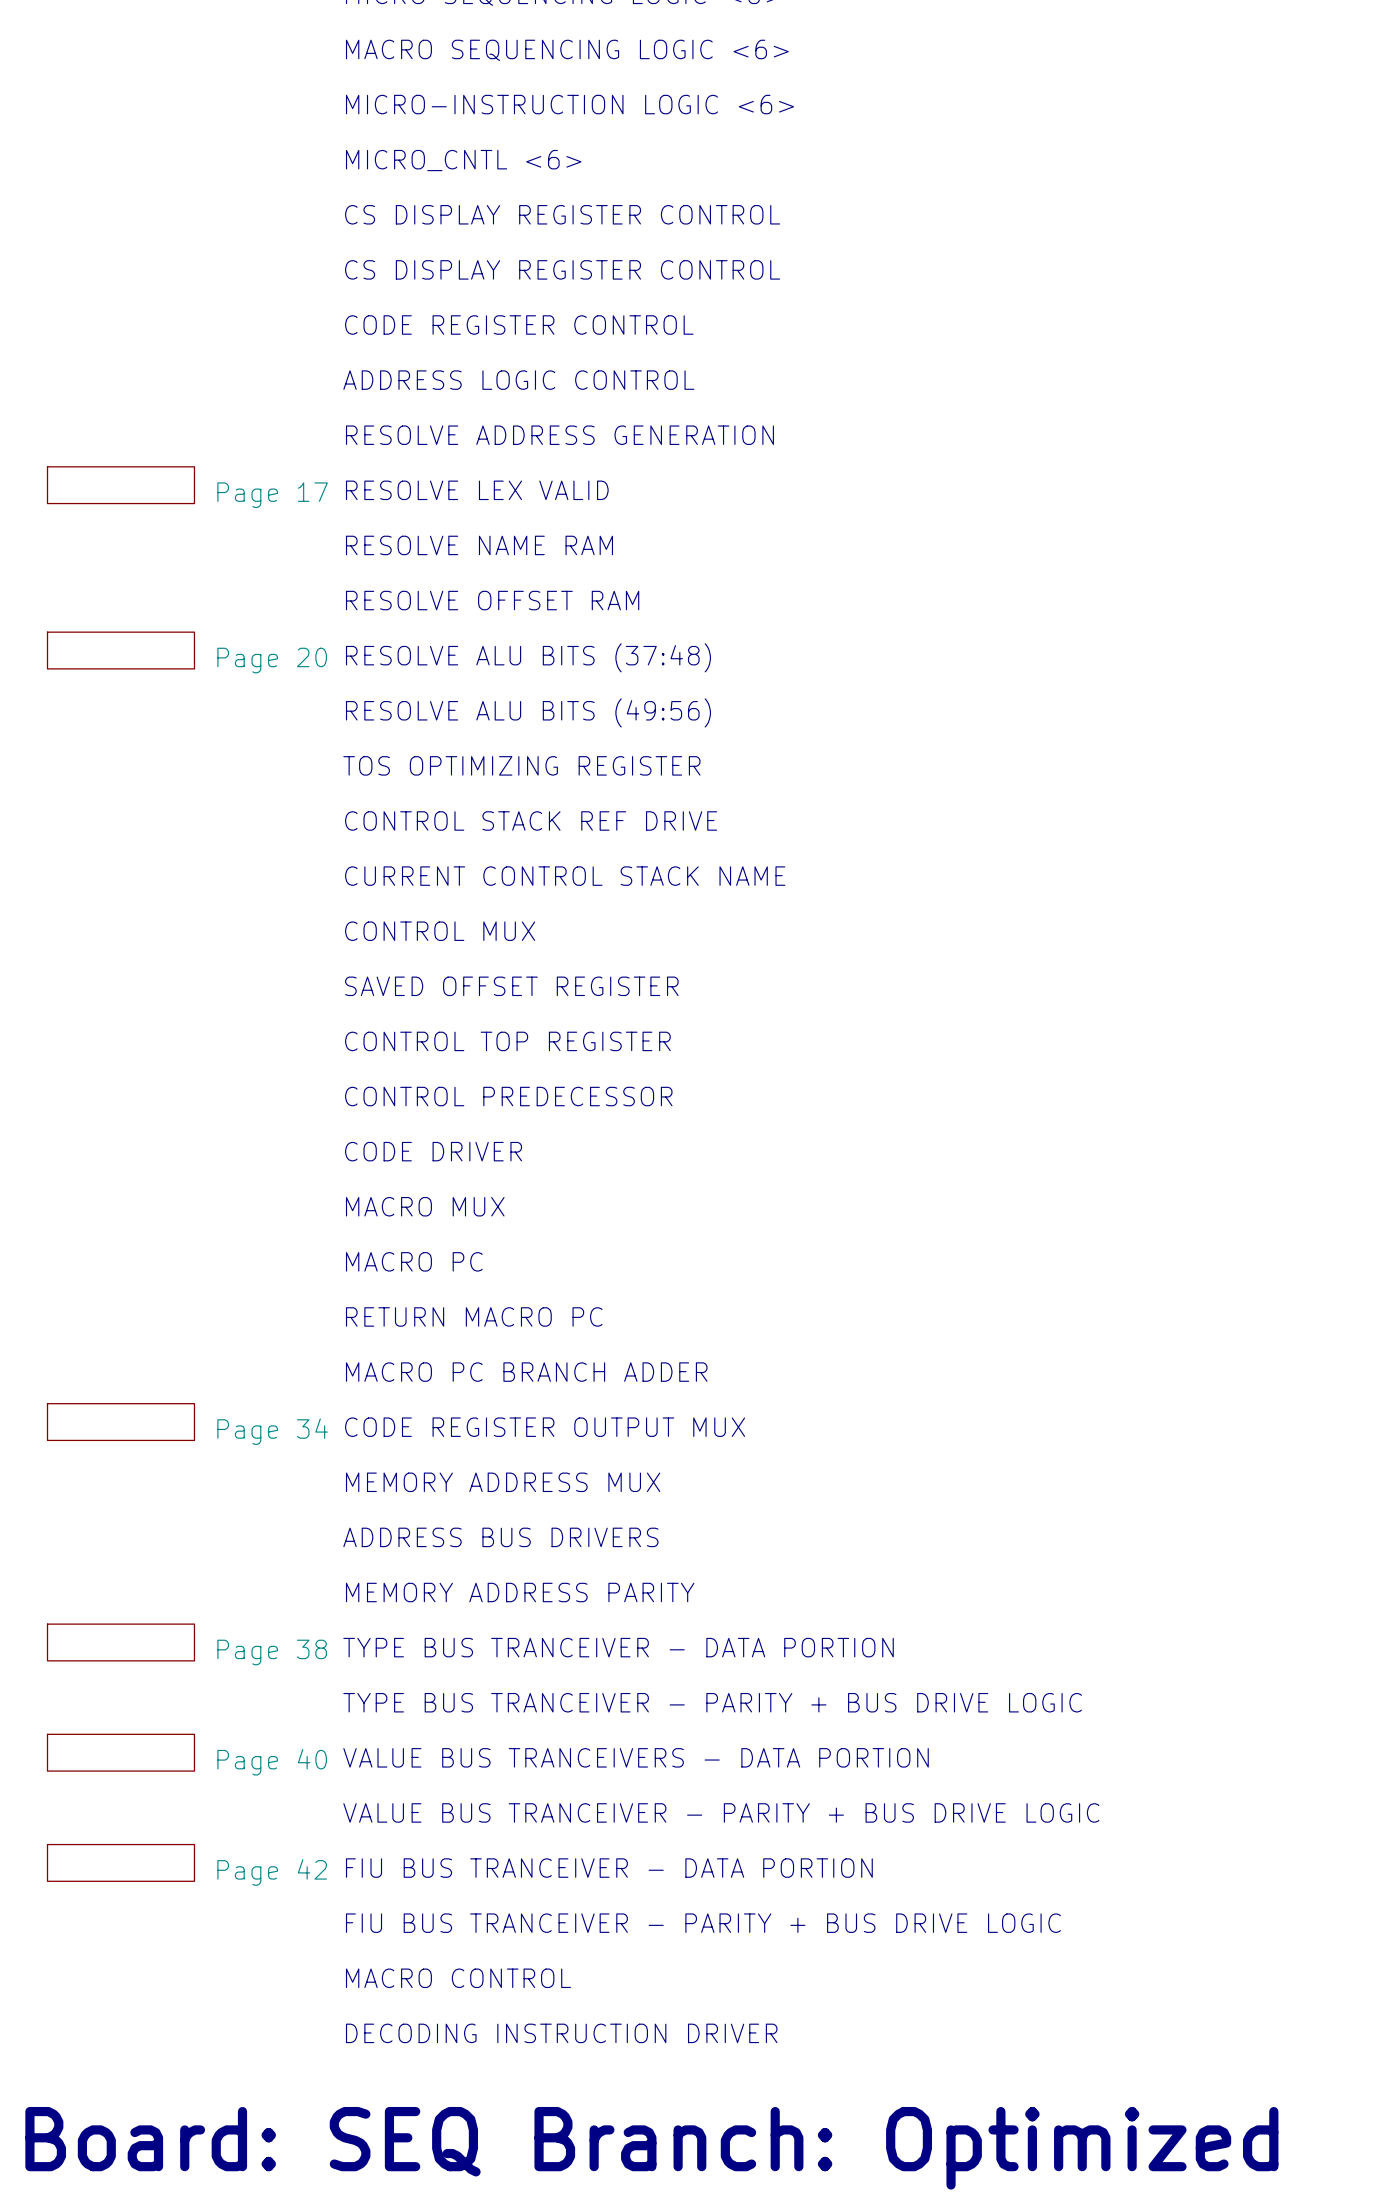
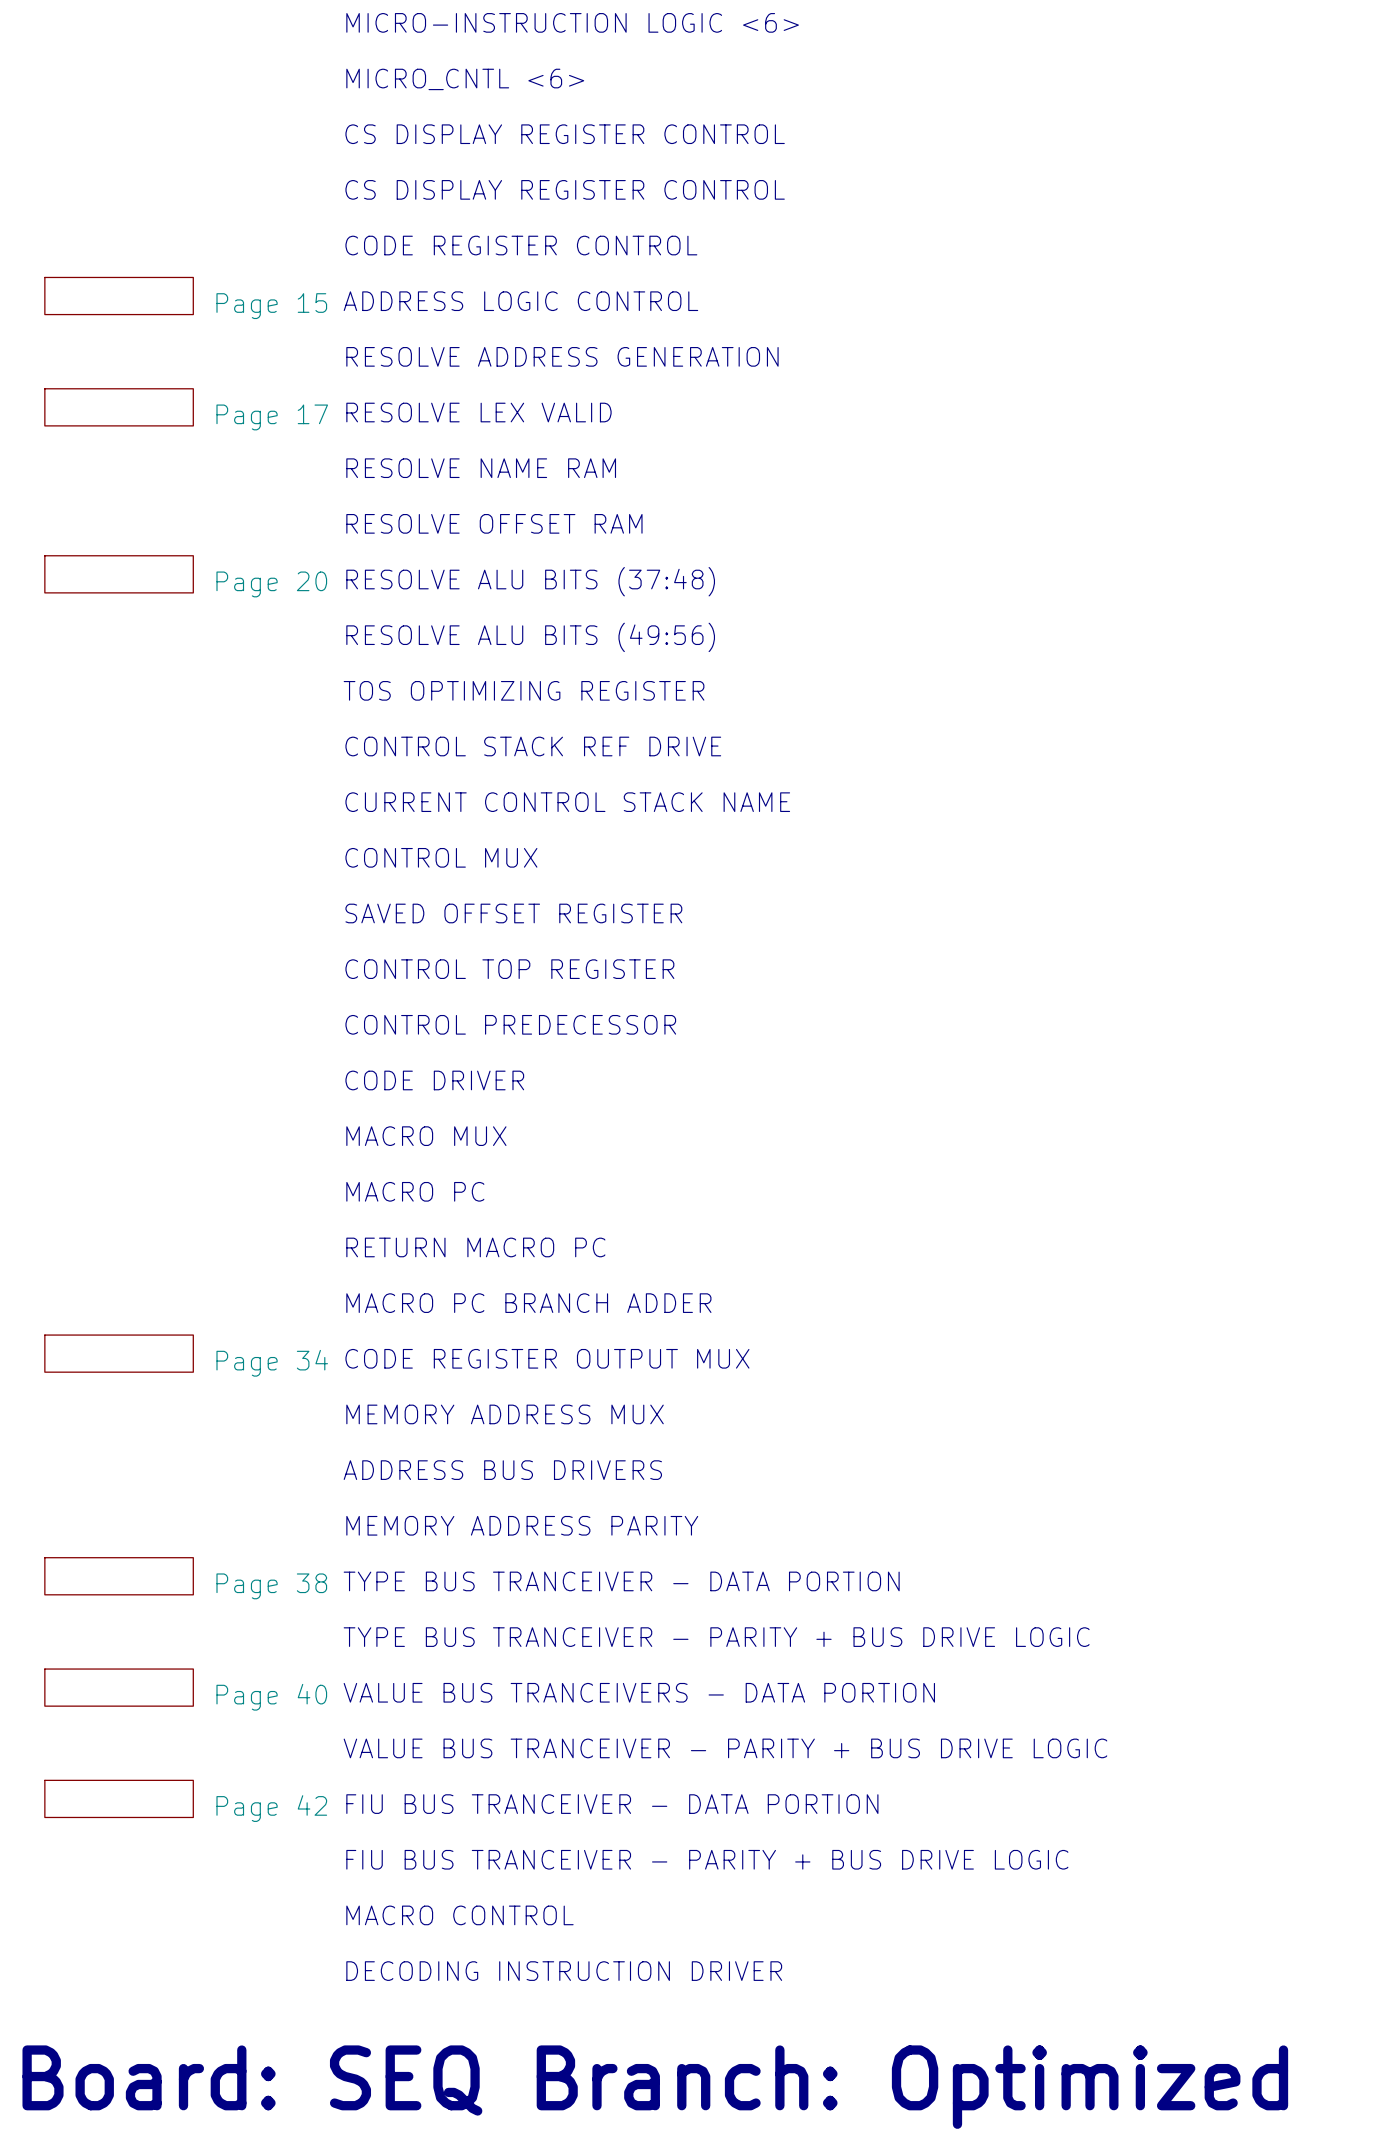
sheet Page 15: none -> (119, 296)

